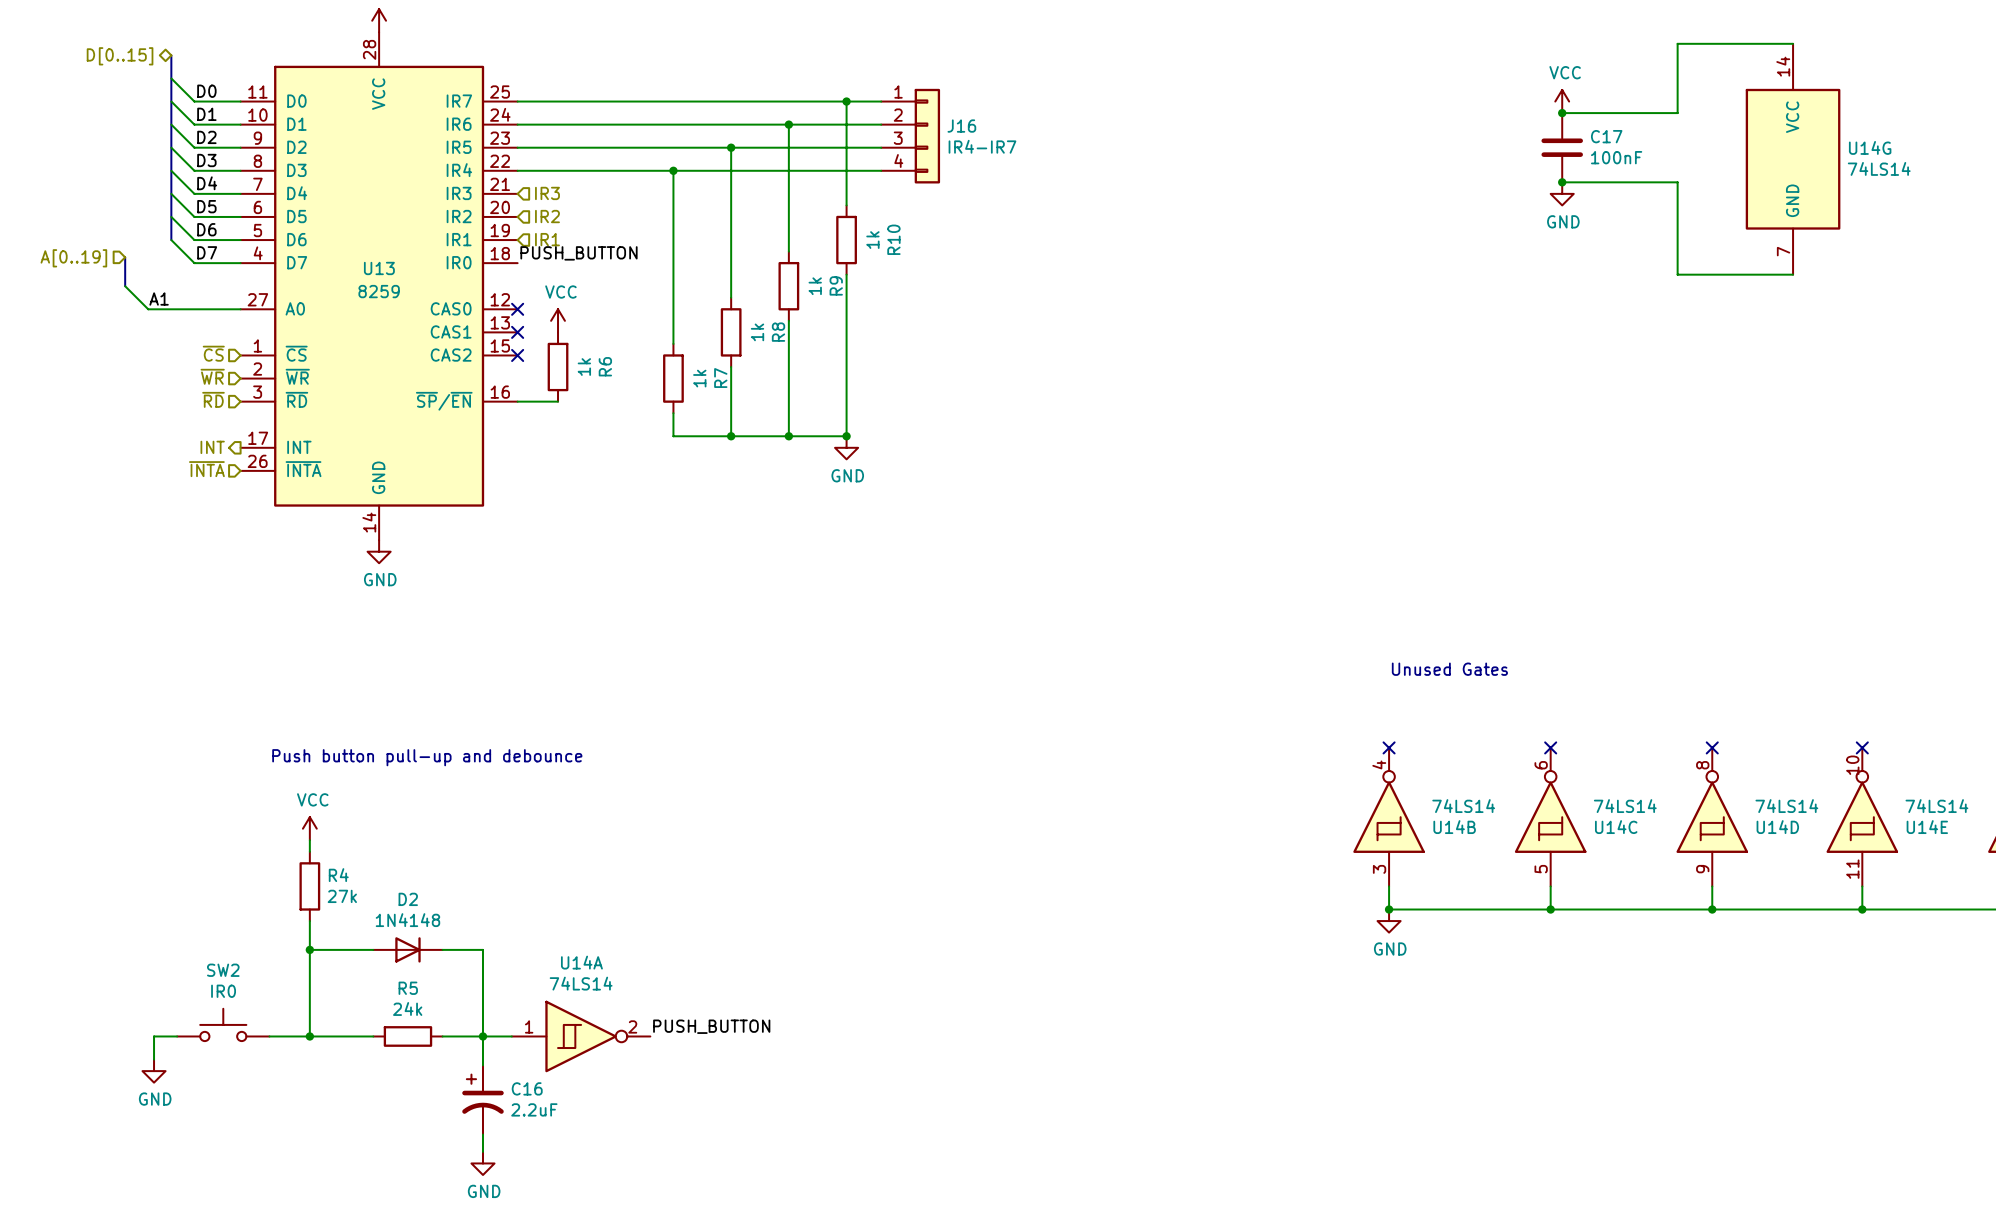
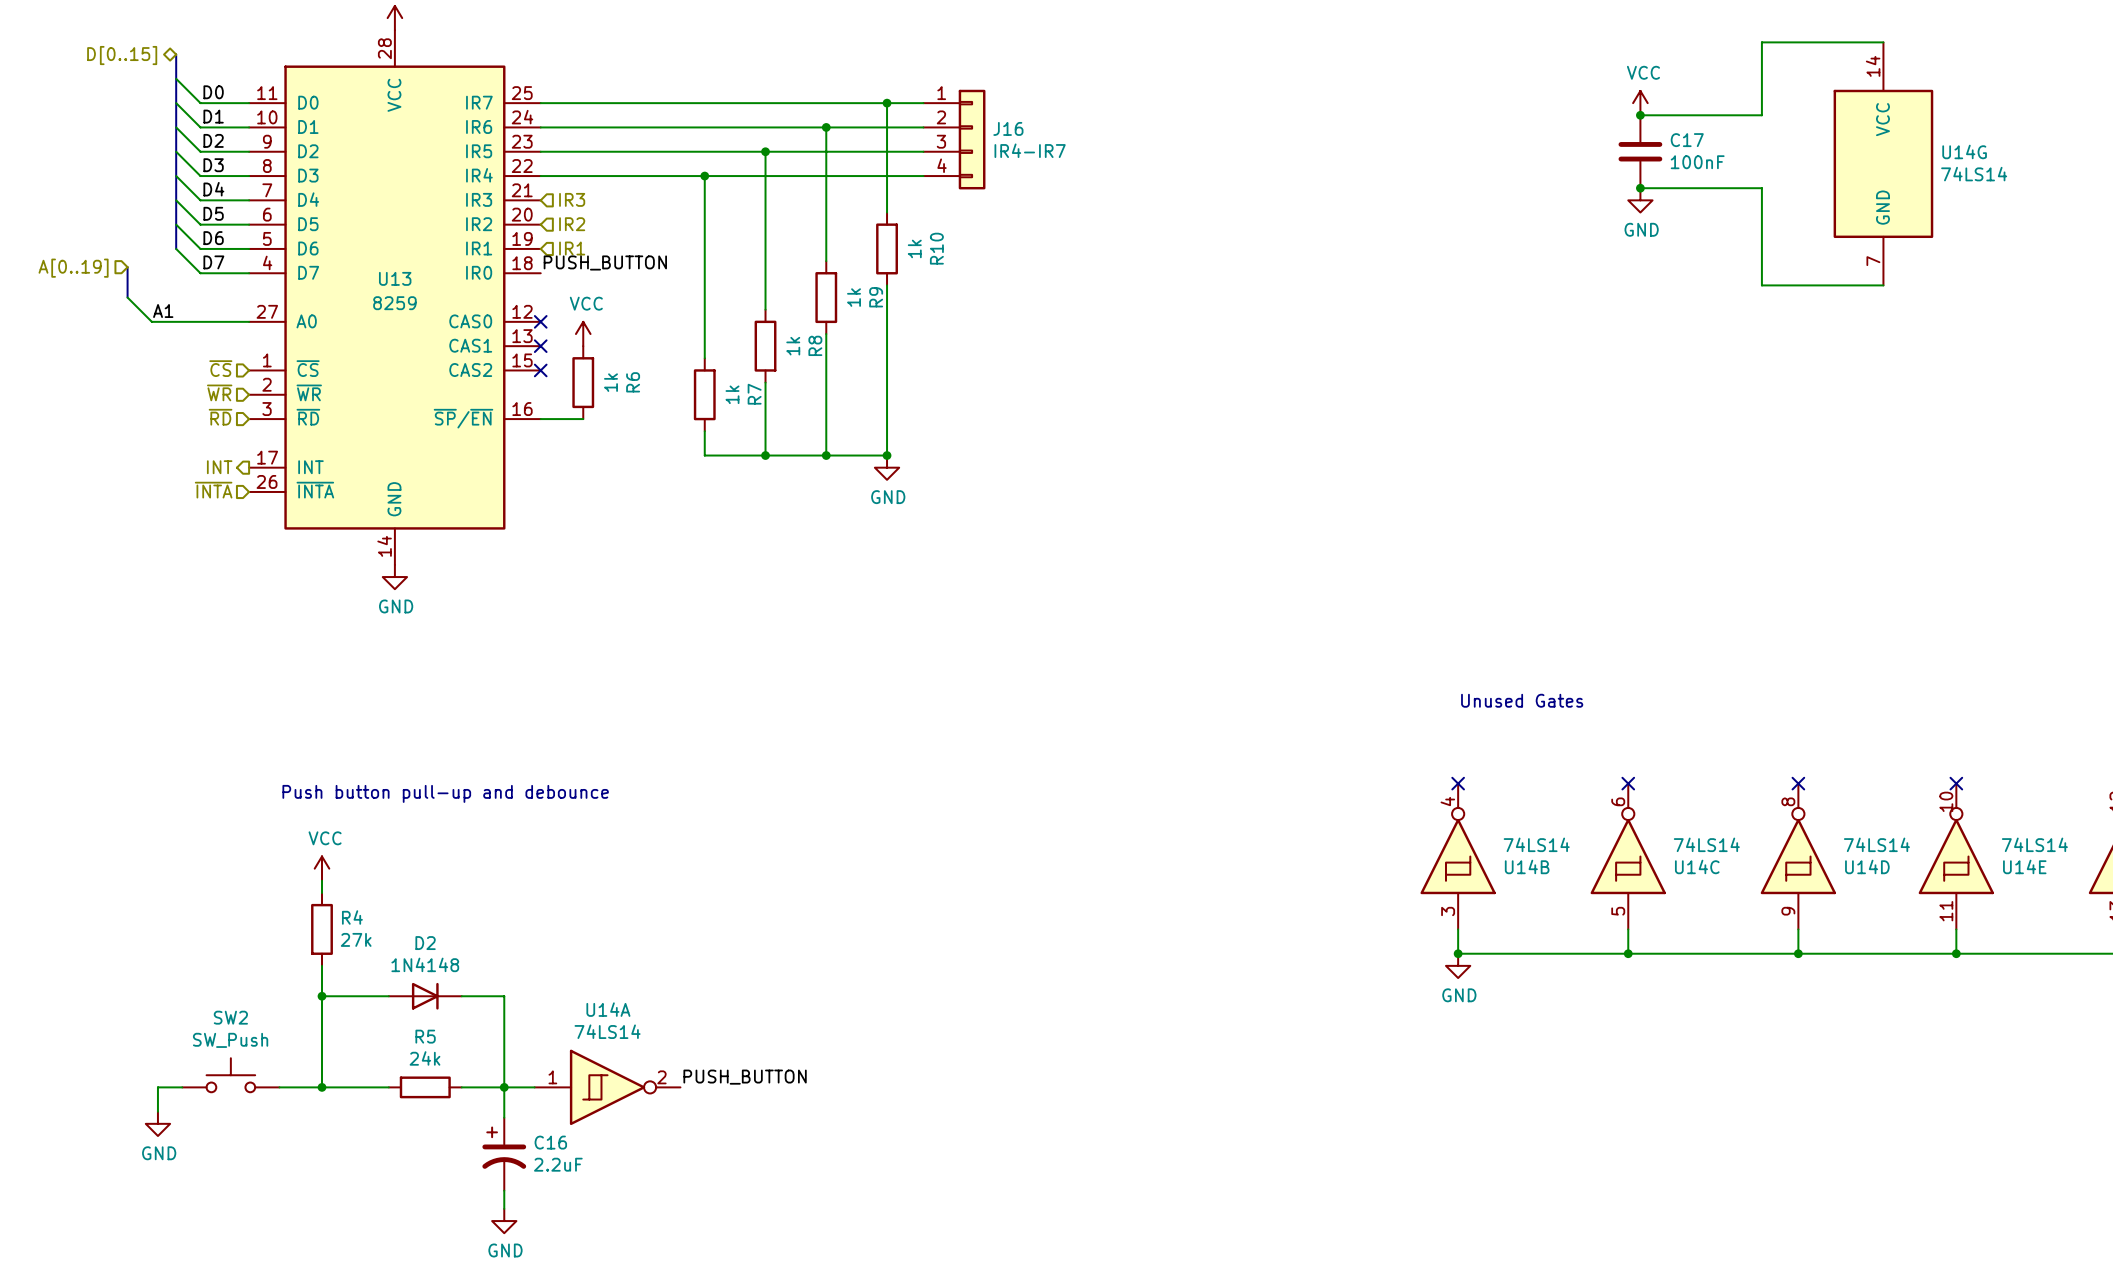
SW2 value: IR0 (223, 991) -> SW_Push (230, 1040)

